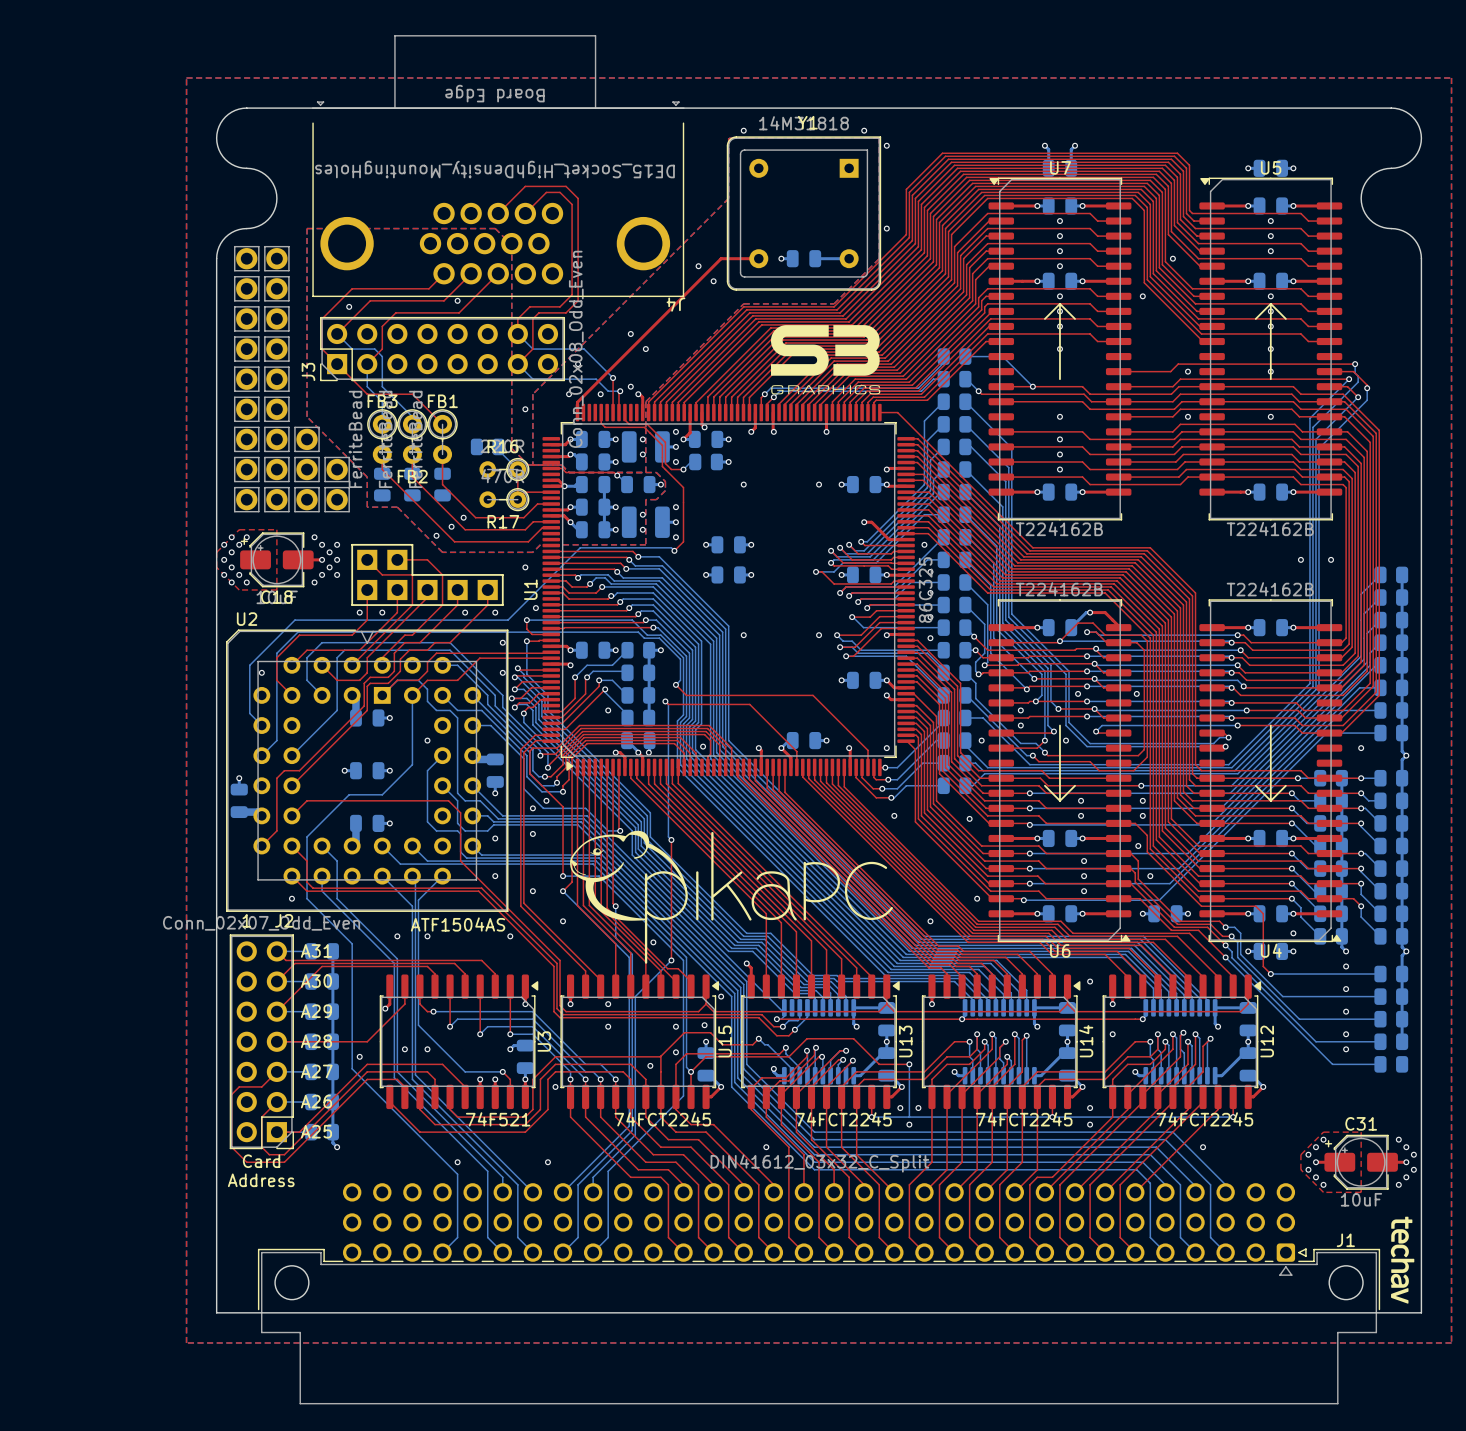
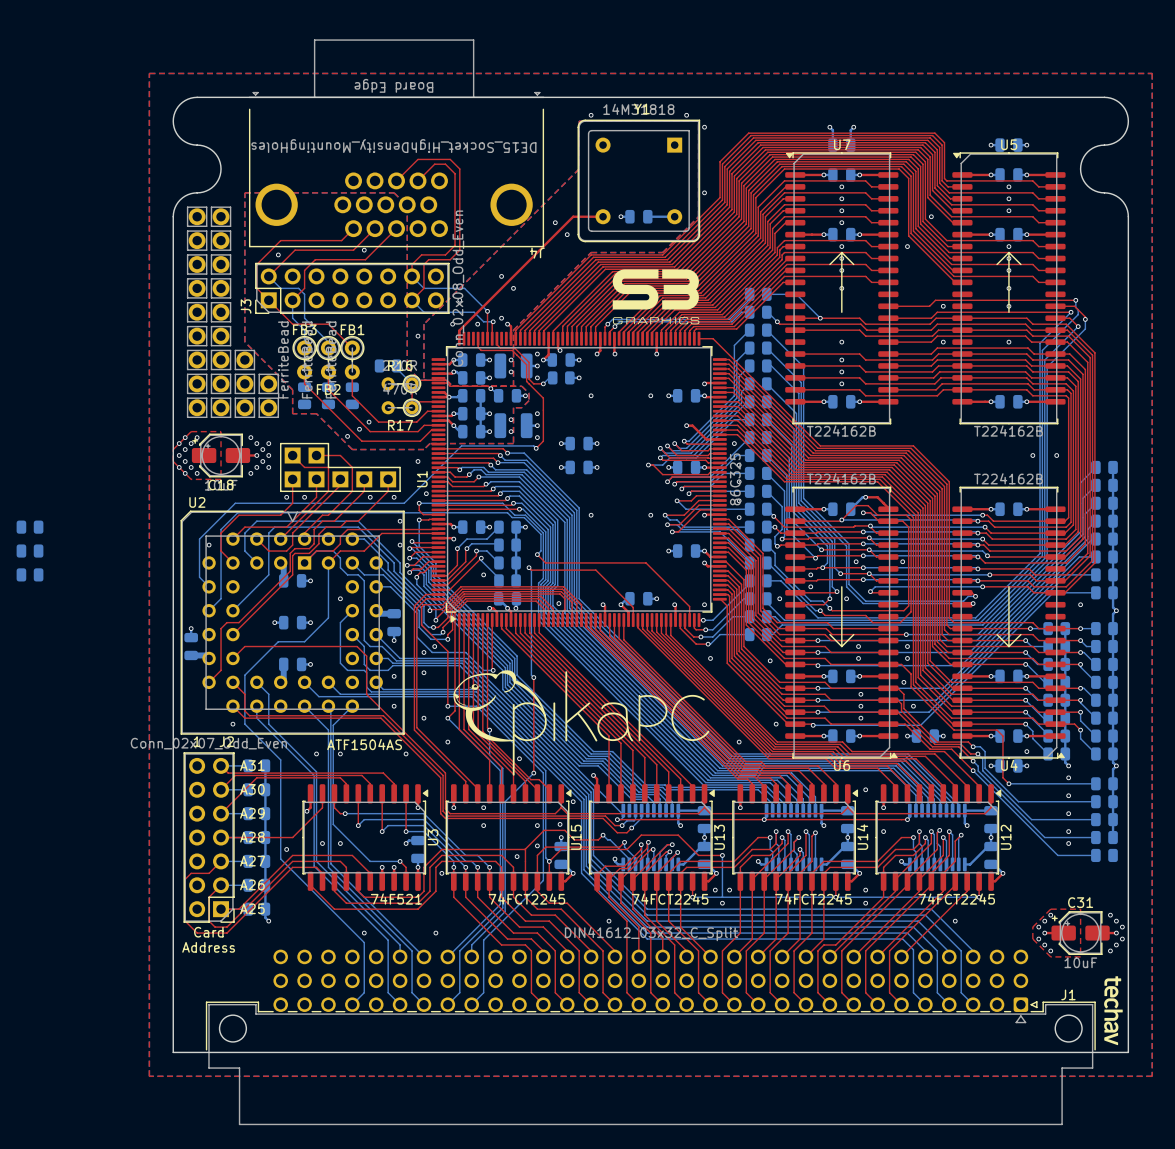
part: none -> (30, 527)
part: none -> (30, 551)
part: none -> (30, 574)

